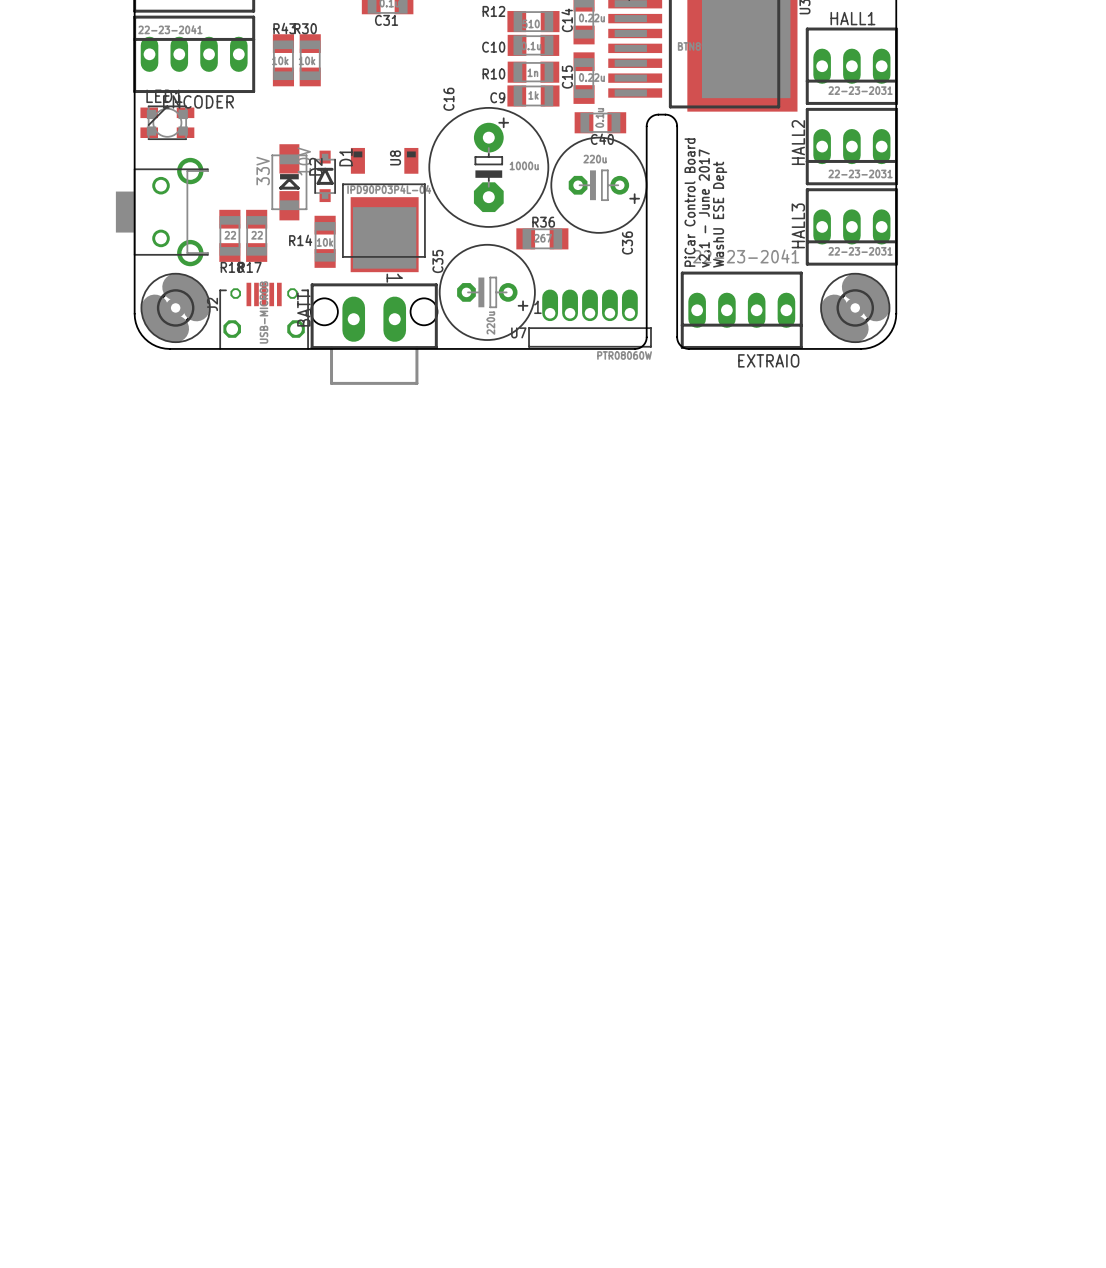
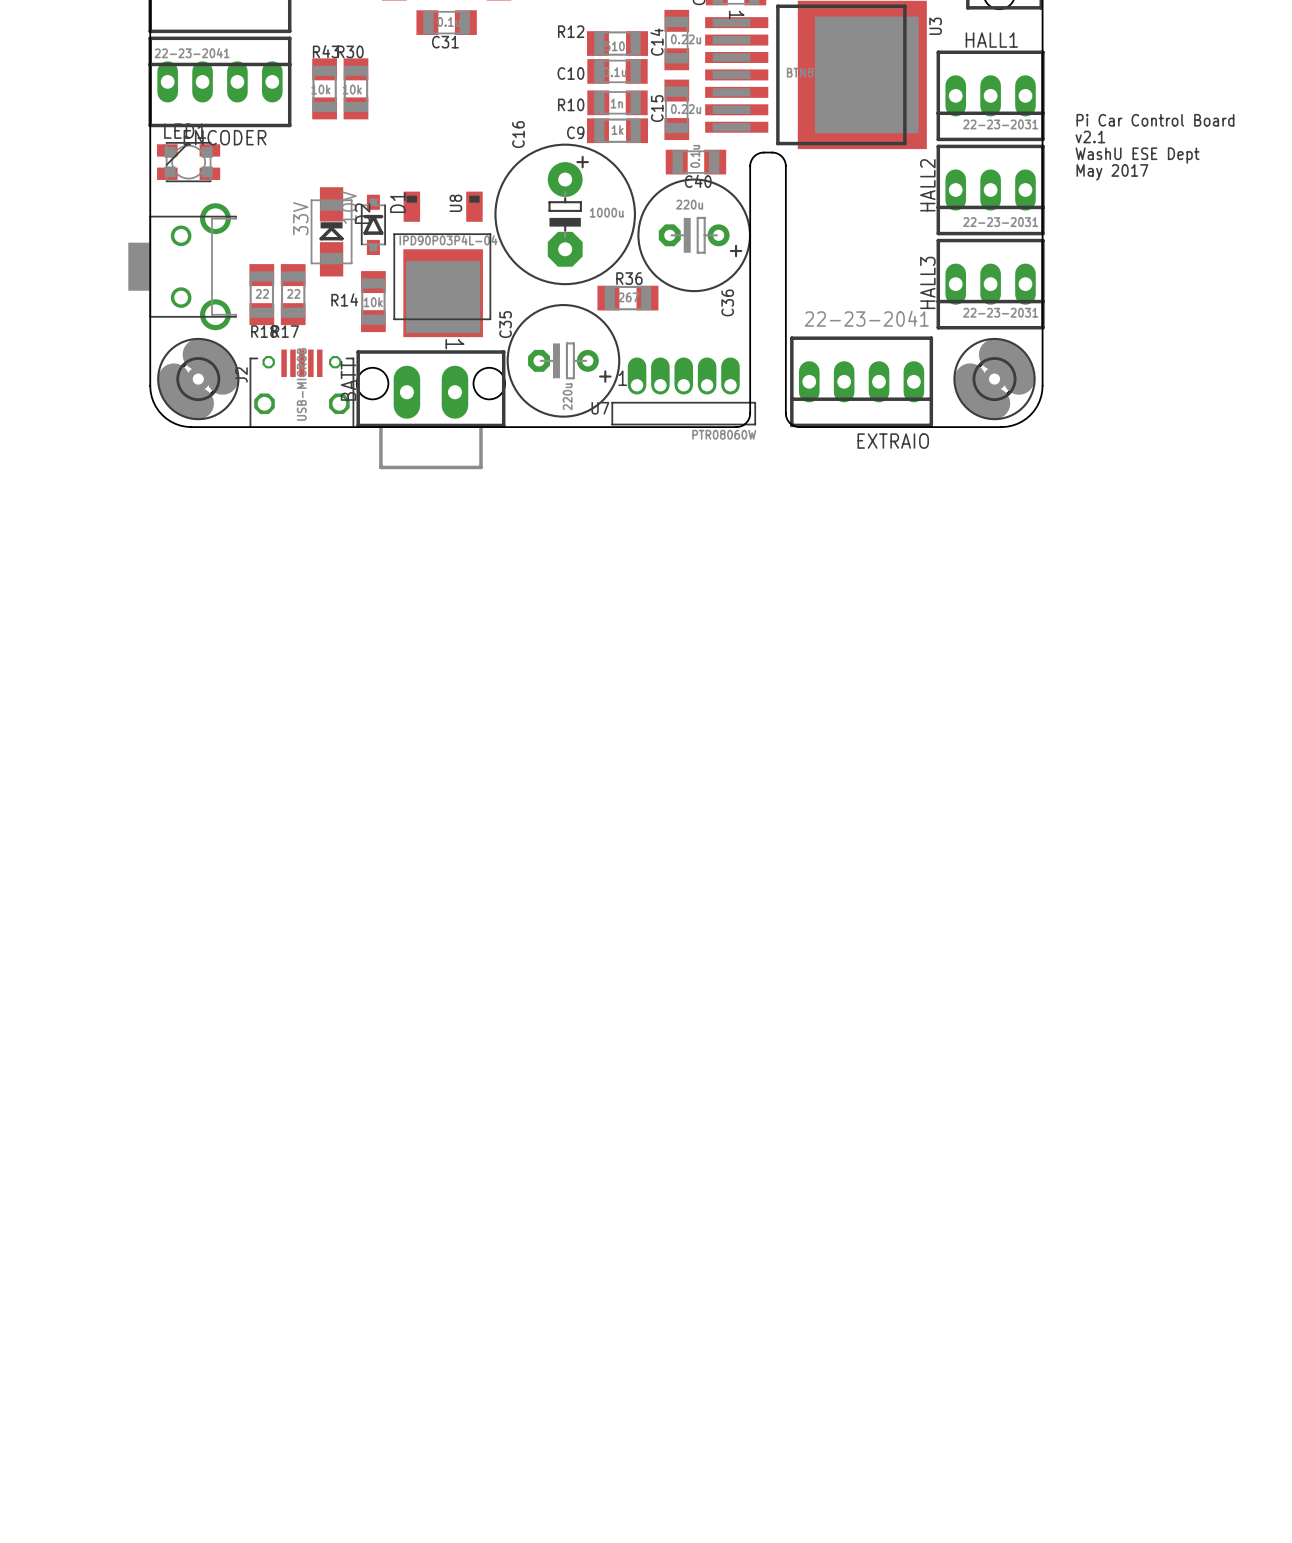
text: none -> Pi Car Control Board (1155, 120)
text: none -> v2.1 (1090, 136)
text: none -> May 2017 (1112, 172)
text: PiCar Control Board (689, 202) -> none
text: v2.1 - June 2017 (704, 208) -> none
text rotation: 0° (720, 214) -> 90° clockwise (1137, 155)
text position: WashU ESE Dept (720, 214) -> WashU ESE Dept (1137, 155)

